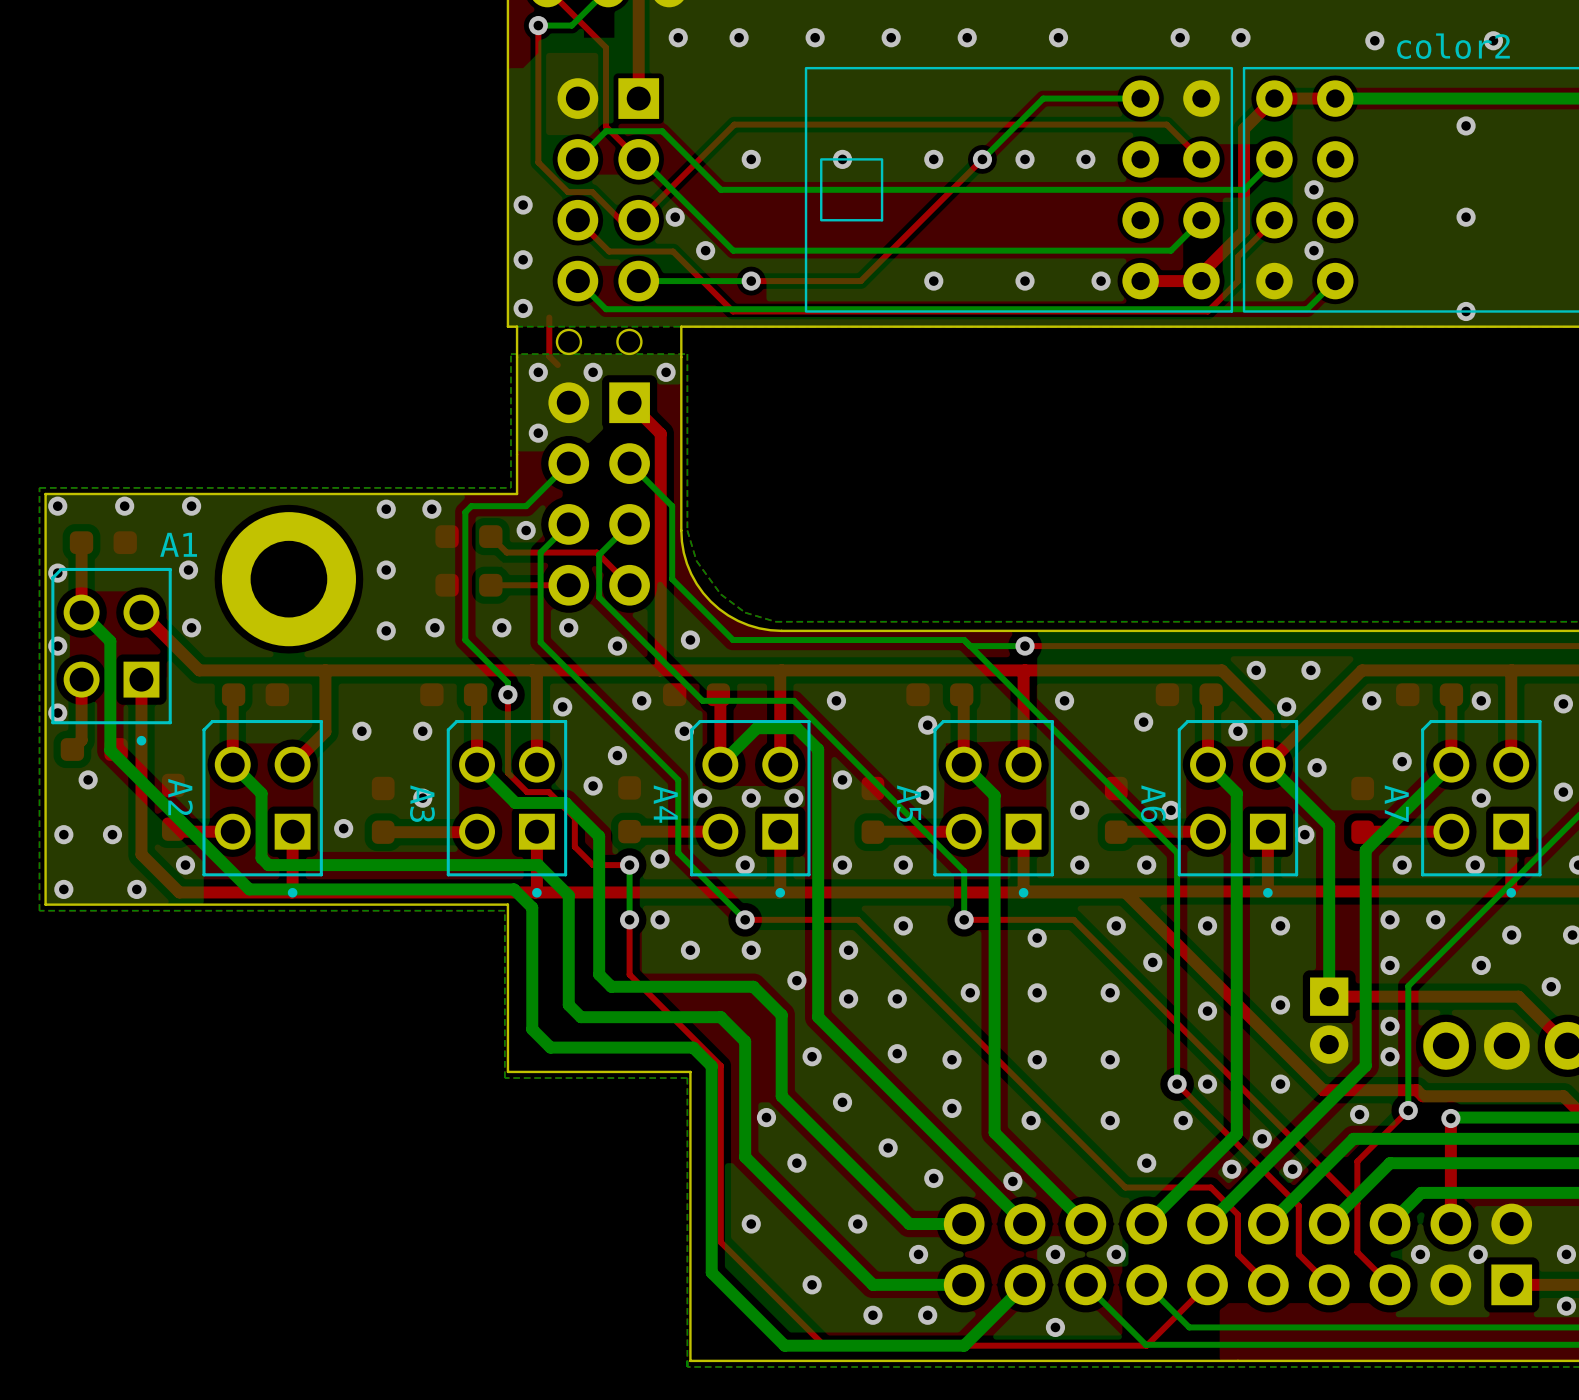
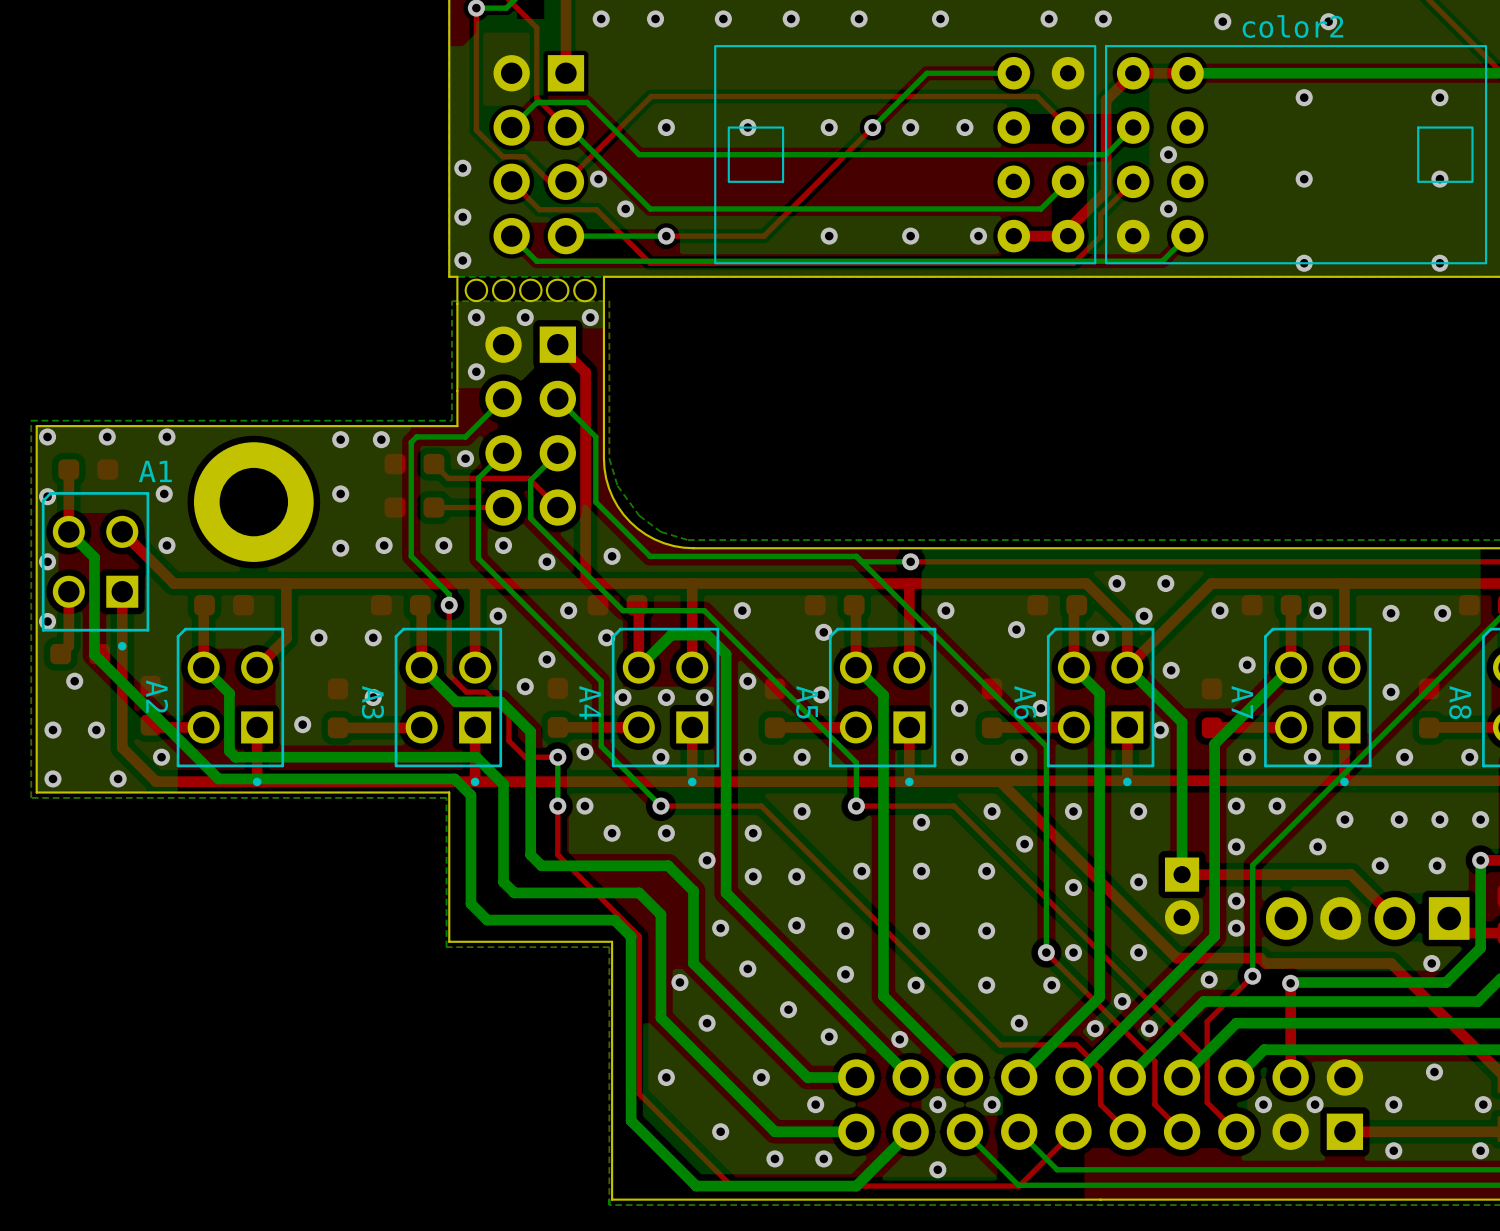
top track: (549, 317) (549, 356) (557, 365) -> none
round board edge: none -> [464, 278, 489, 303]
round board edge: none -> [519, 278, 543, 303]
round board edge: none -> [573, 278, 597, 303]

